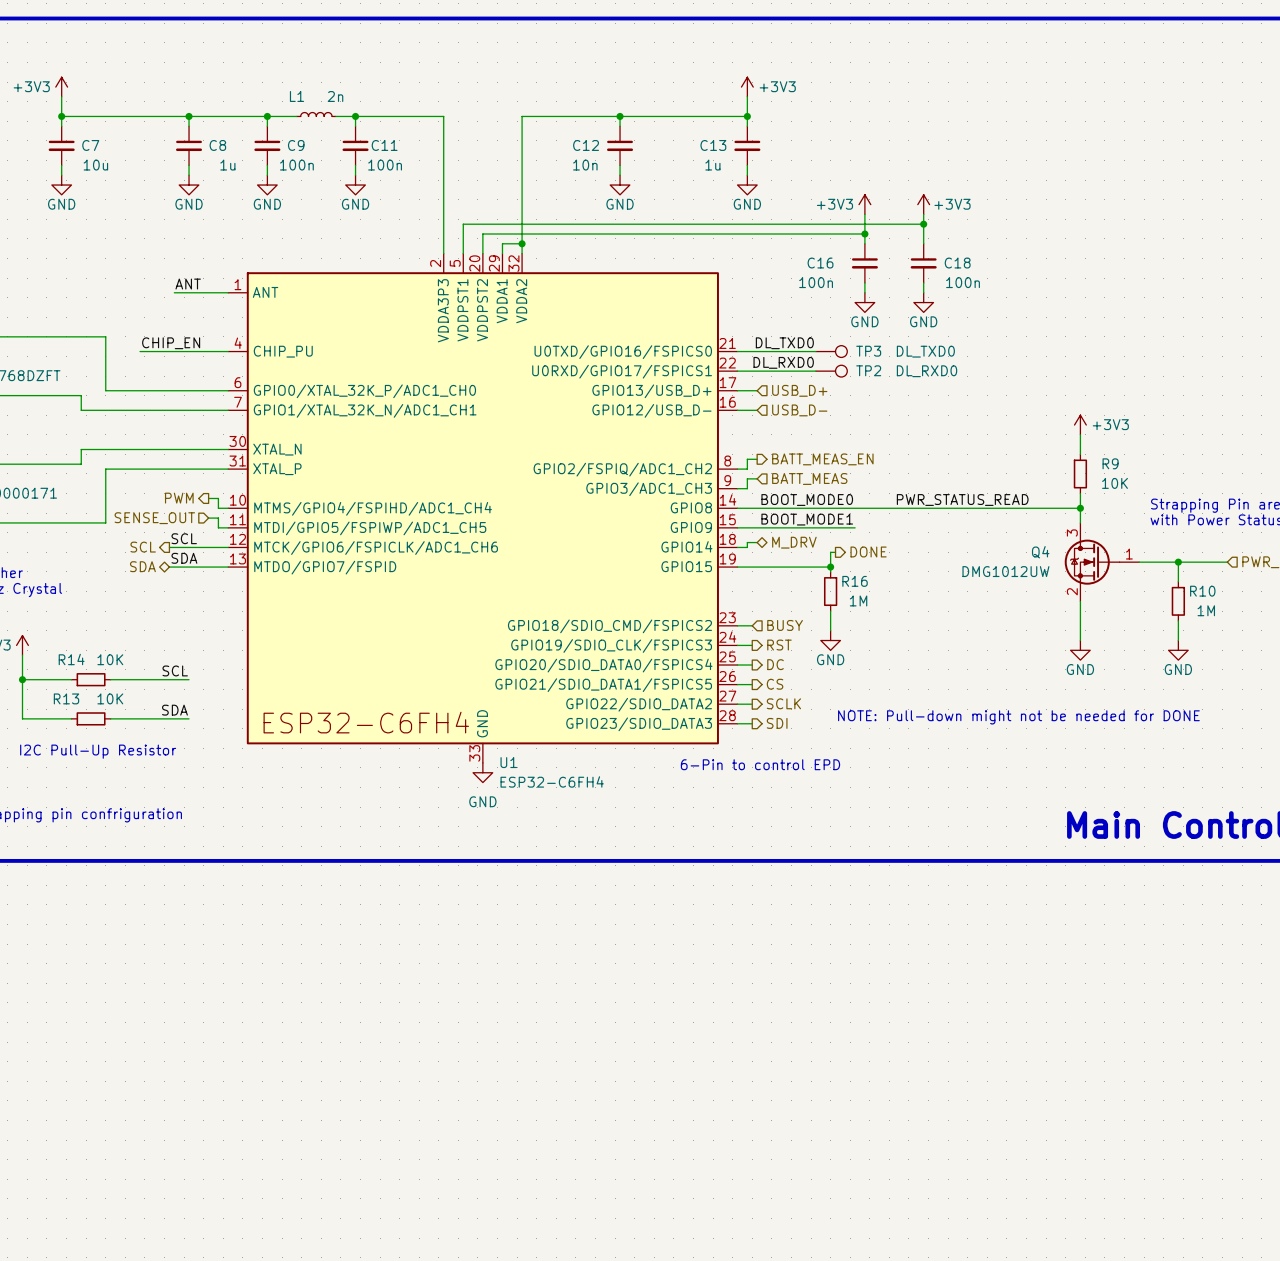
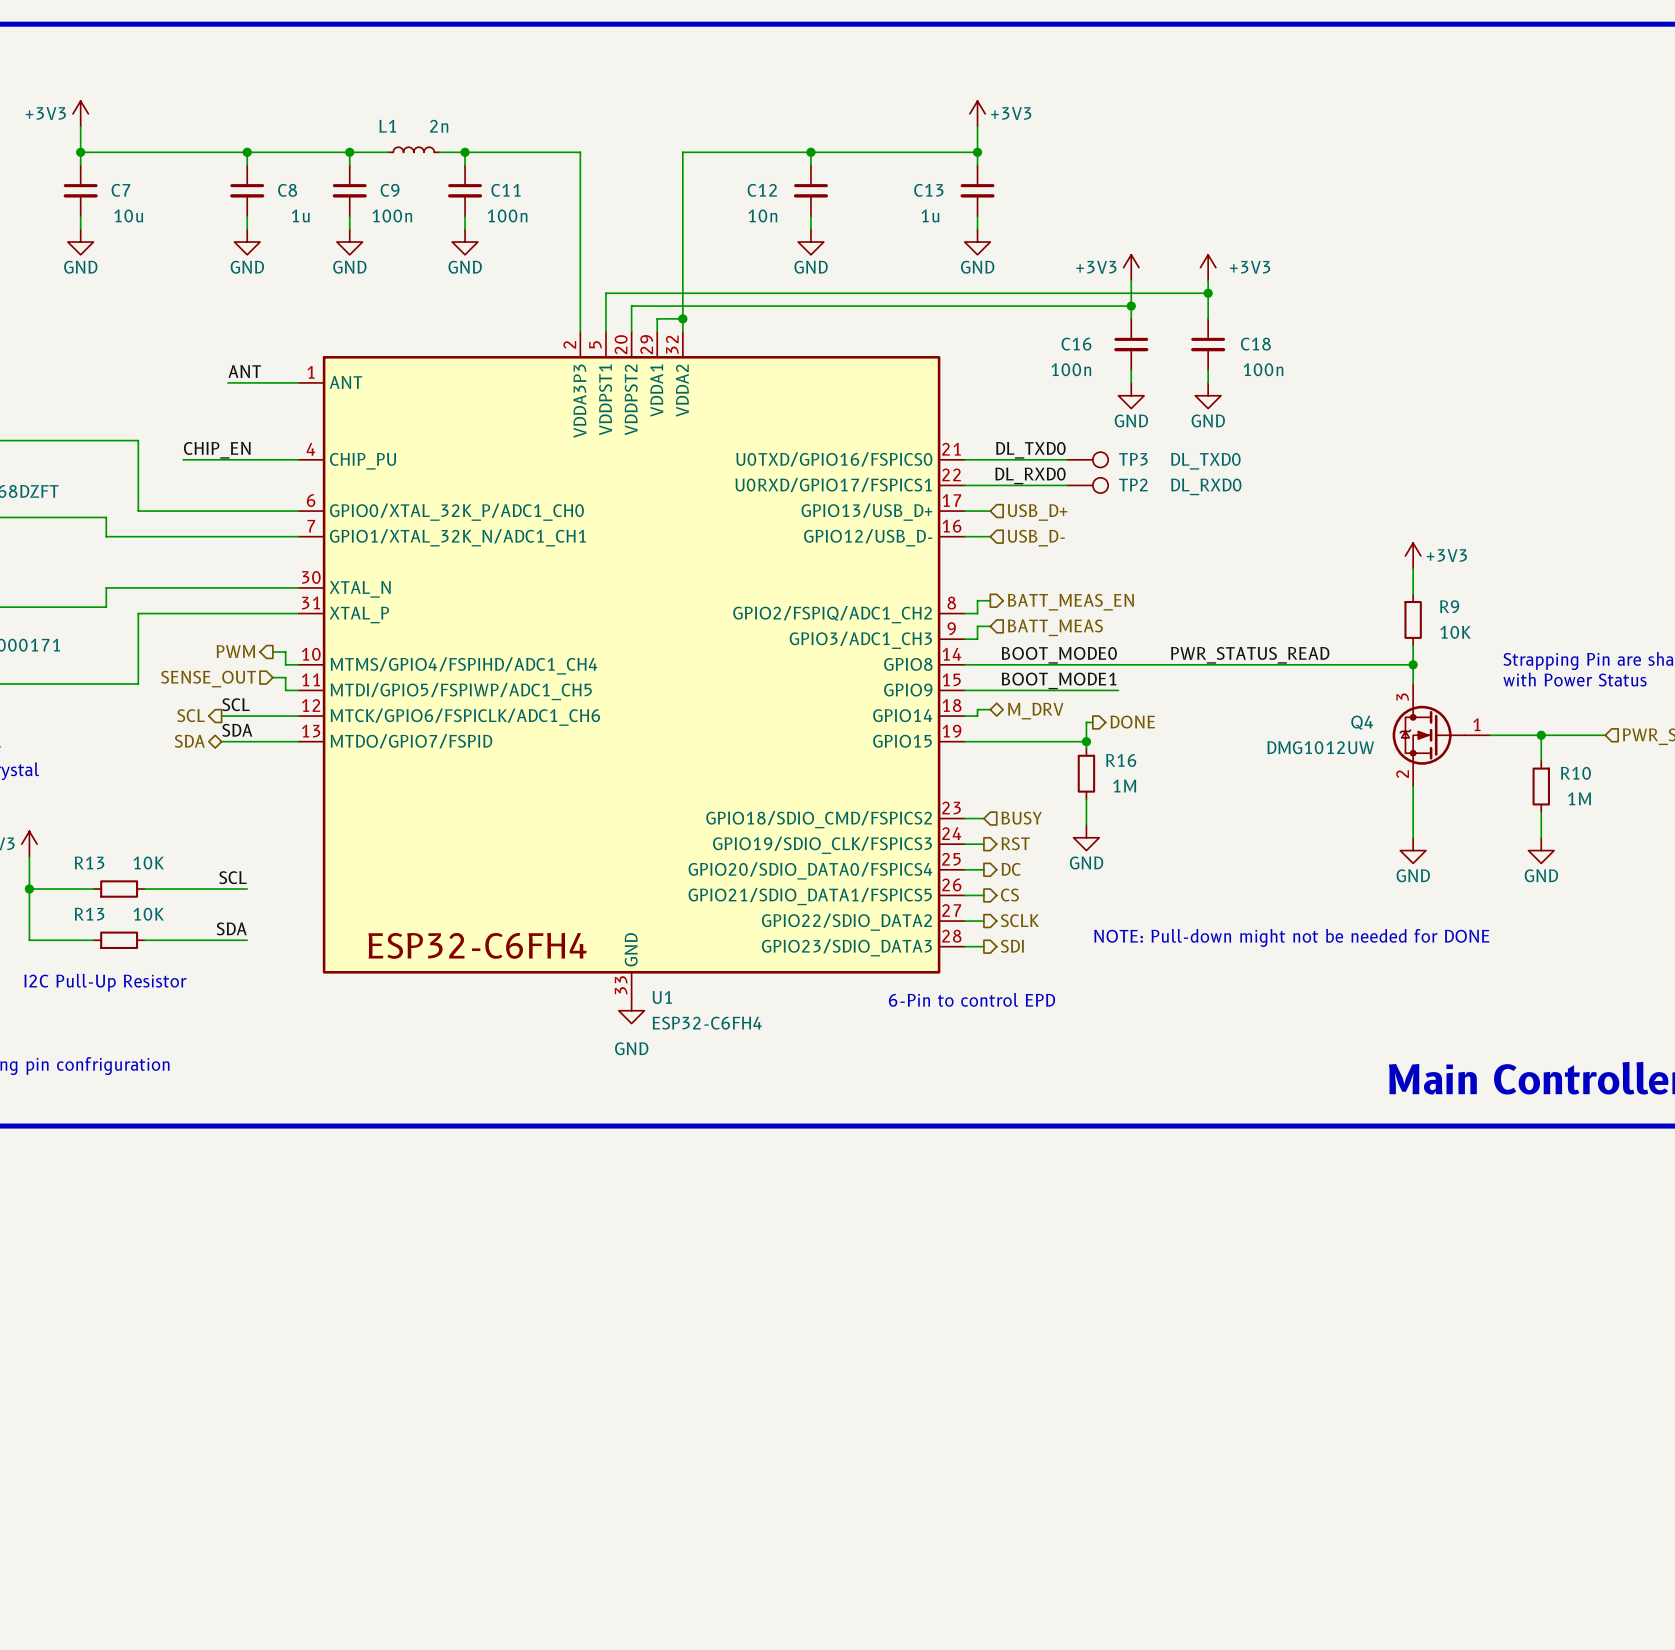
R14 name: R14 (71, 659) -> R13 (89, 862)

